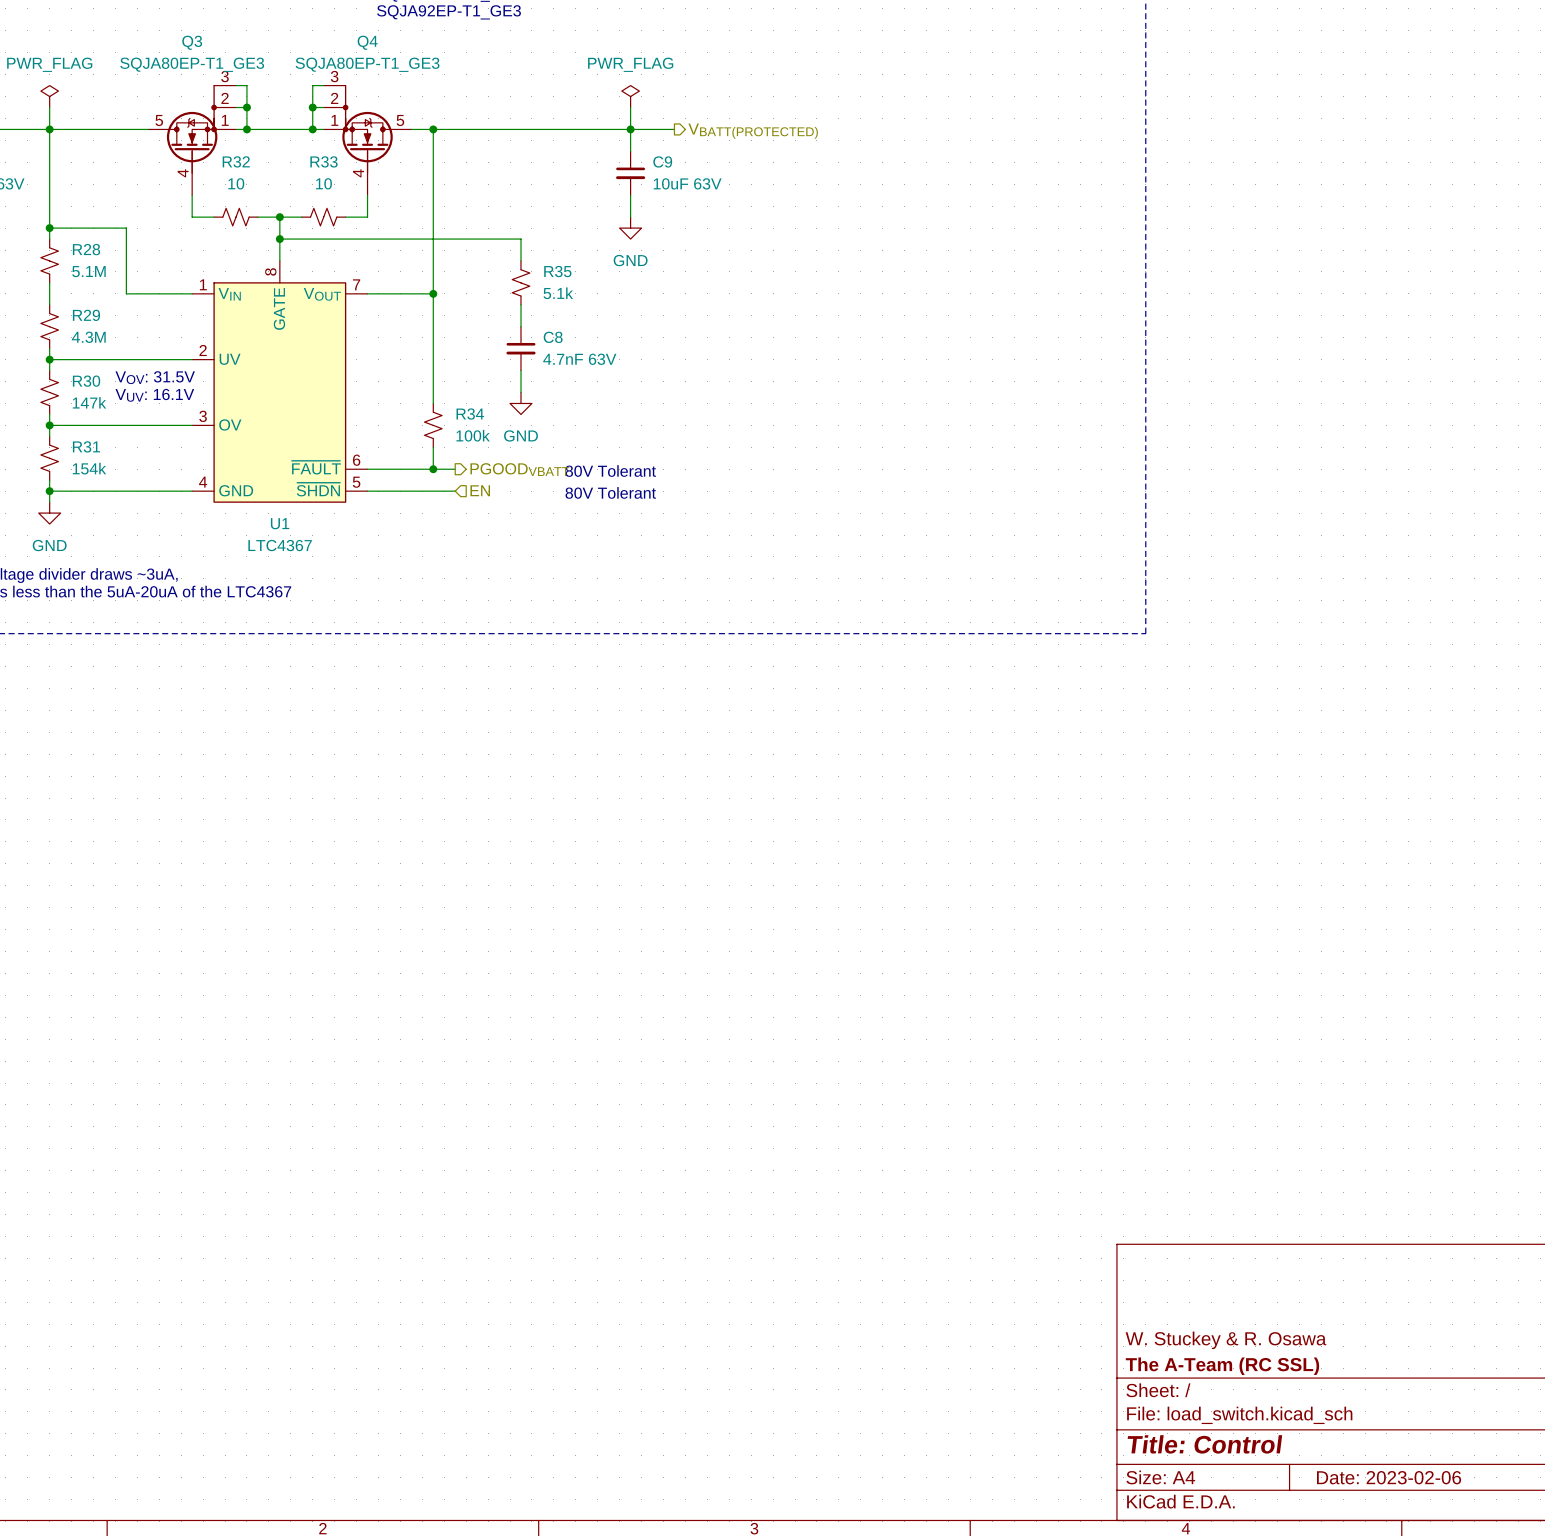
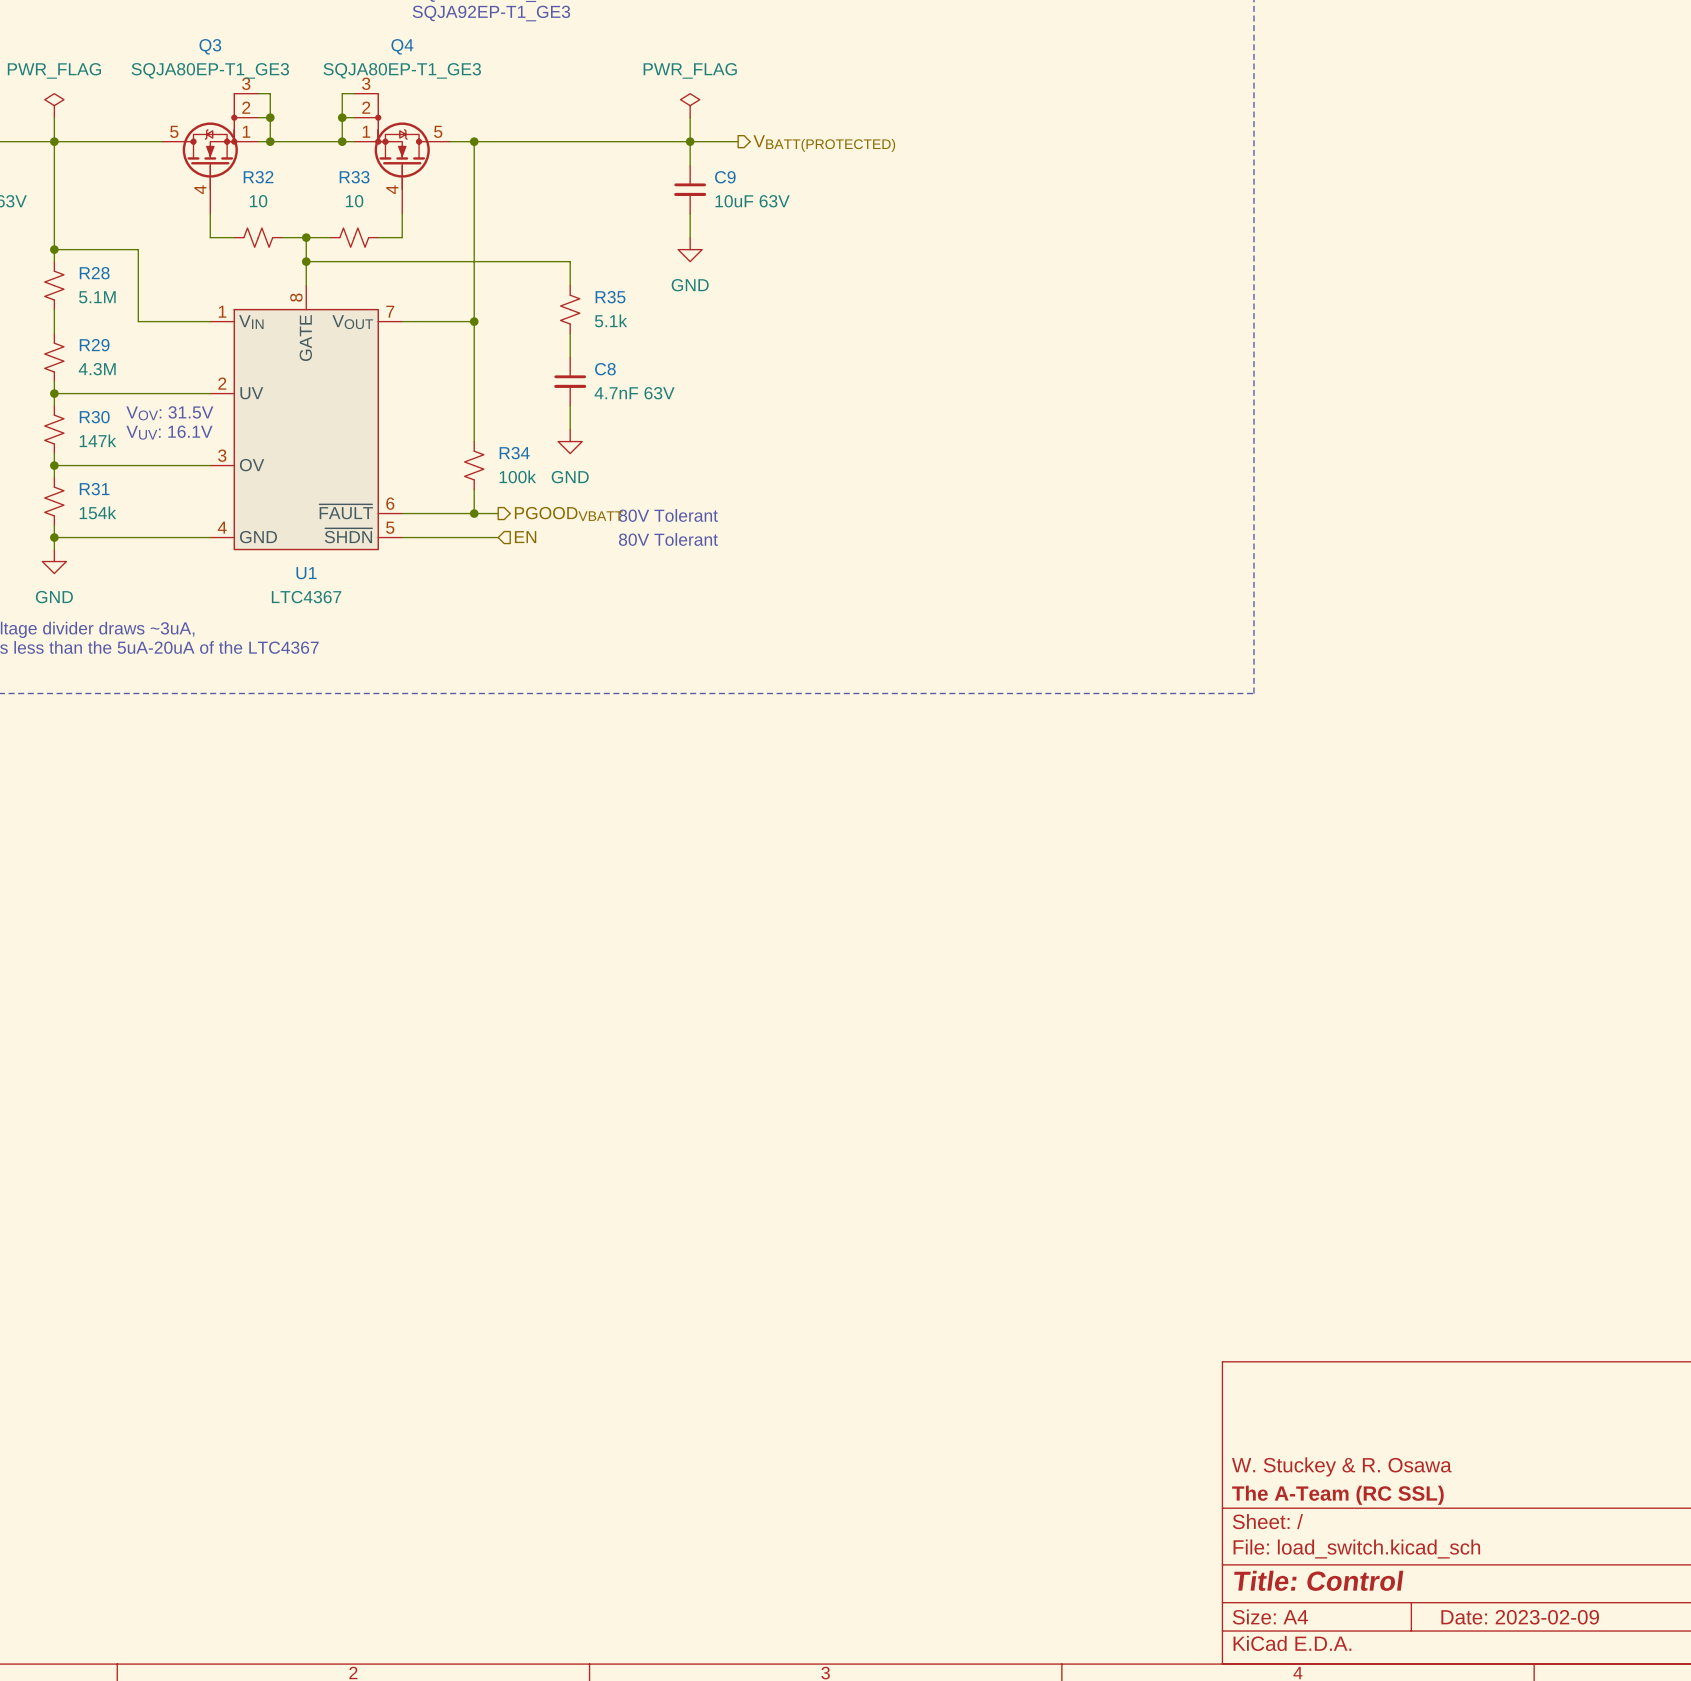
title block: Date: 2023-02-06 (1389, 1477) -> Date: 2023-02-09 (1520, 1617)

